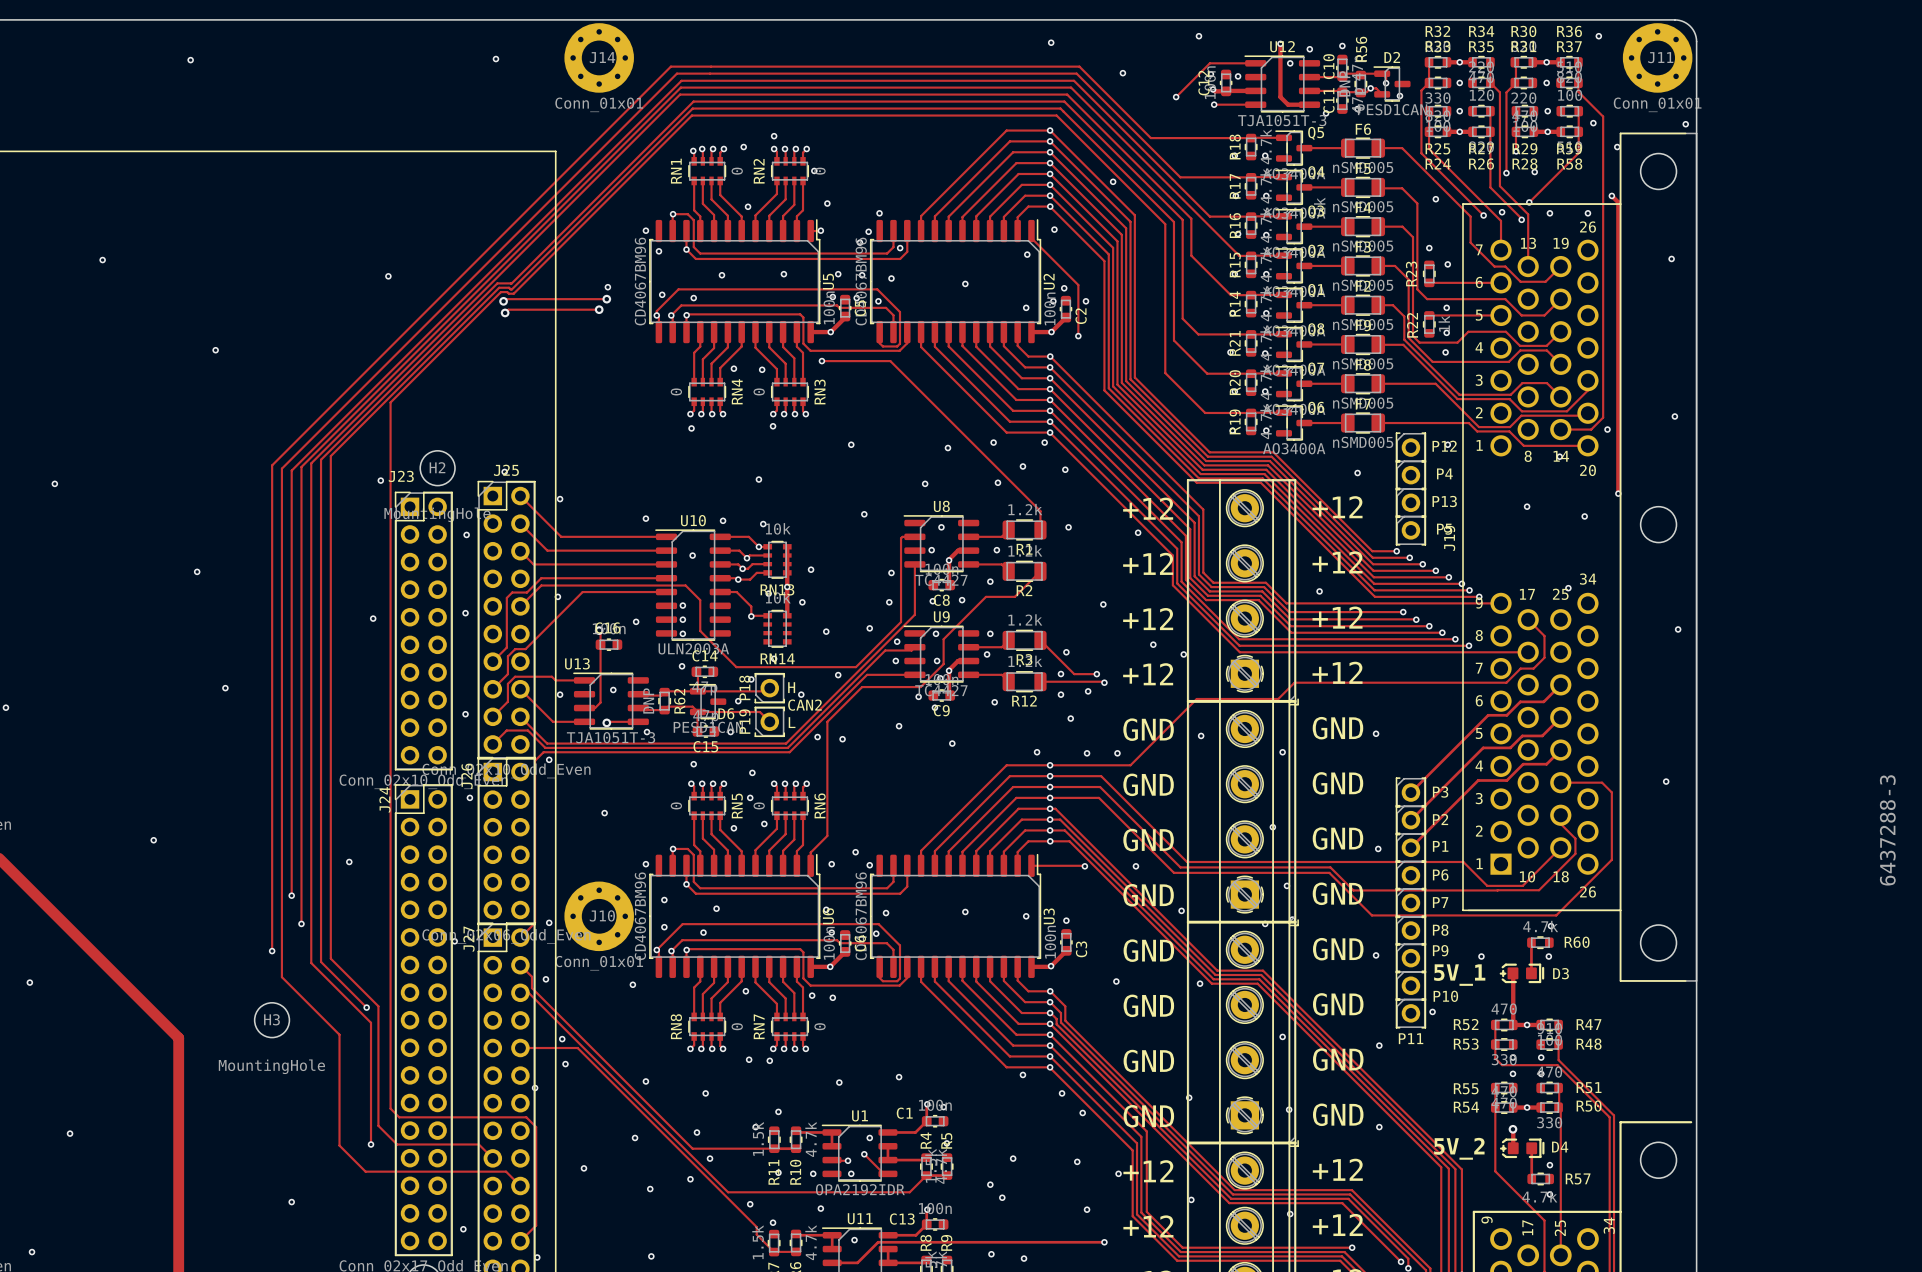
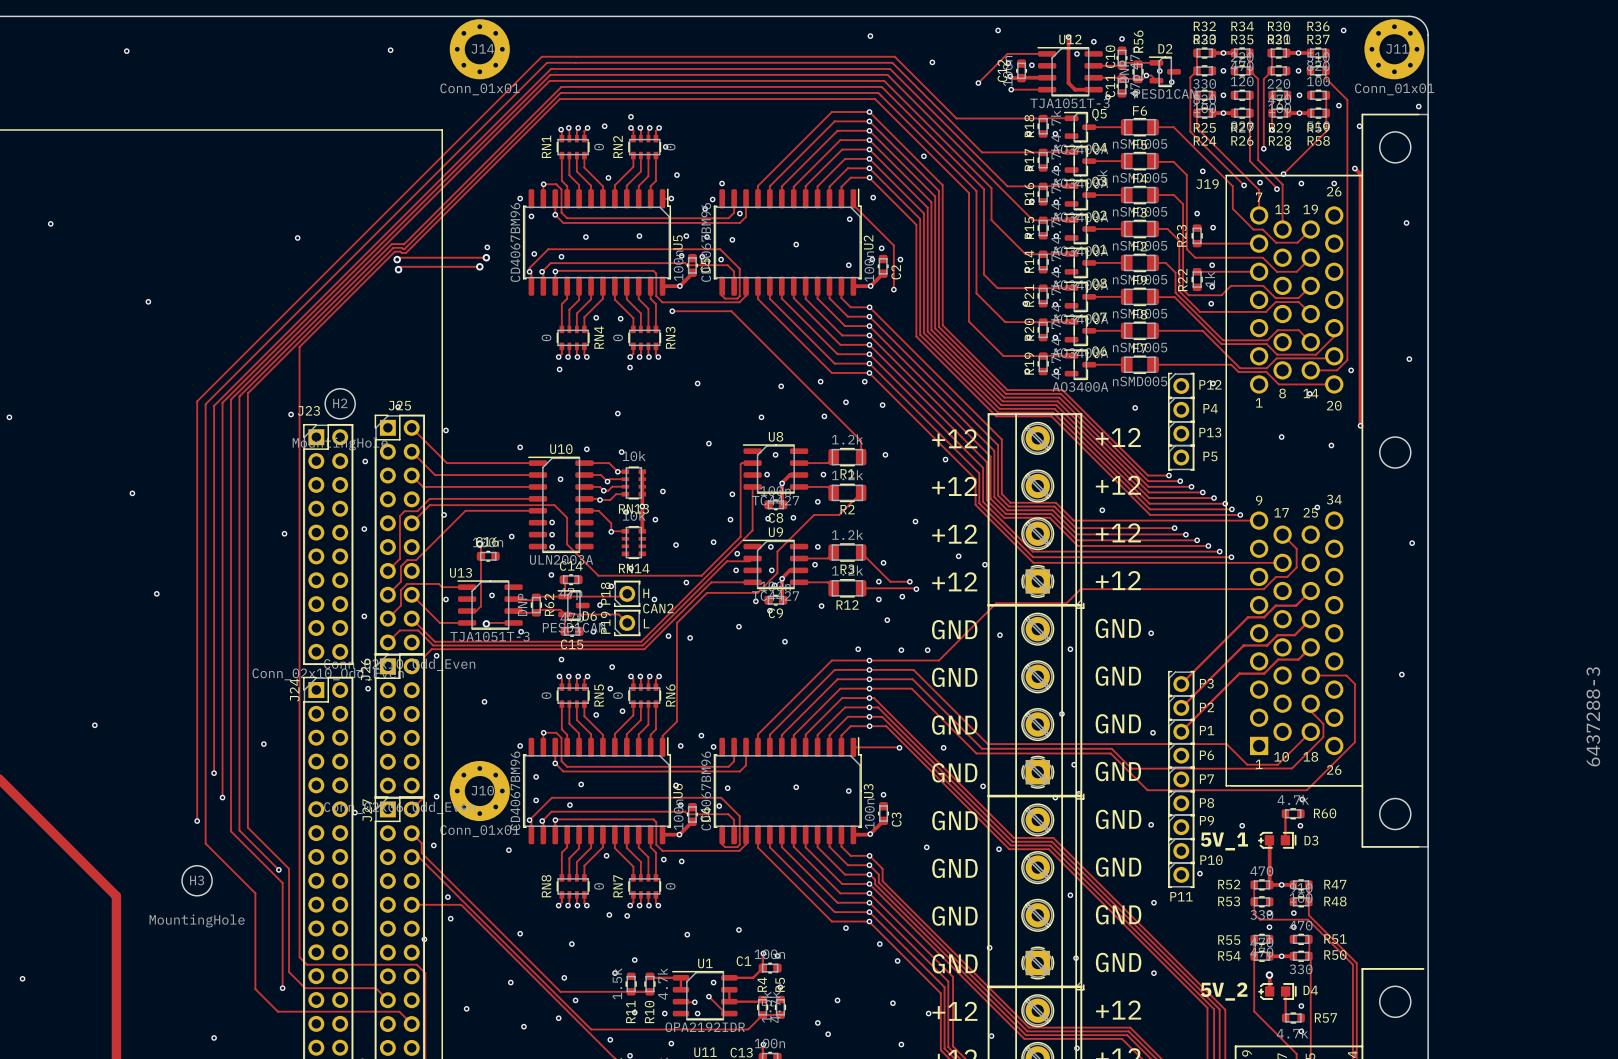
J19 footprint: [1462, 132, 1698, 982] -> [1225, 113, 1429, 848]
J19 name position: J19 (1449, 538) -> J19 (1207, 184)

